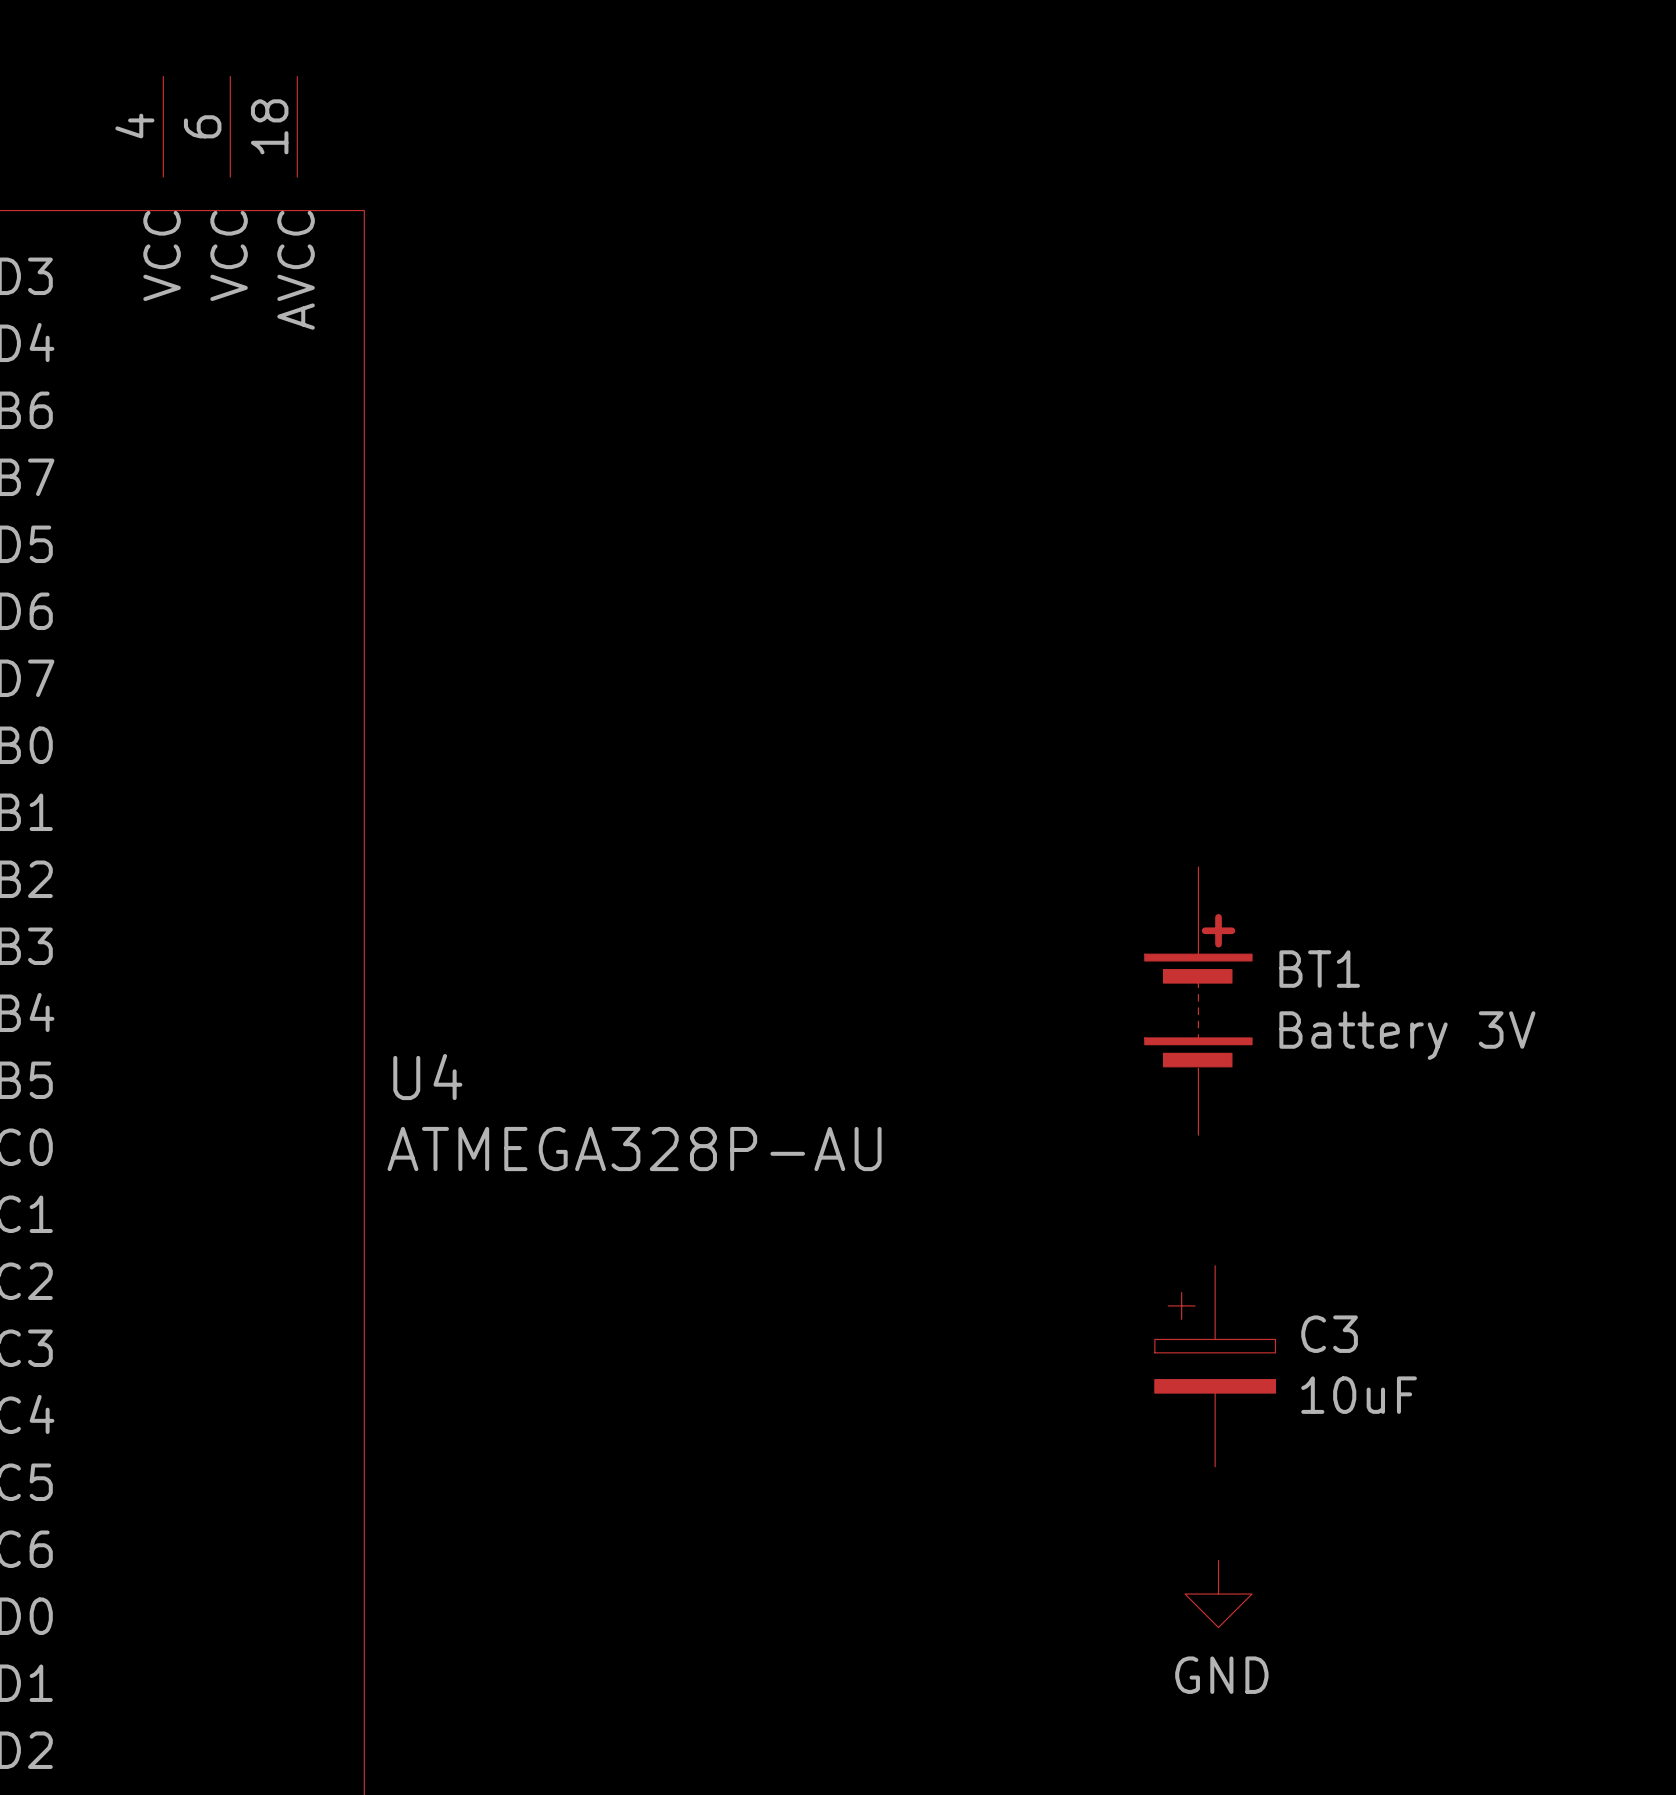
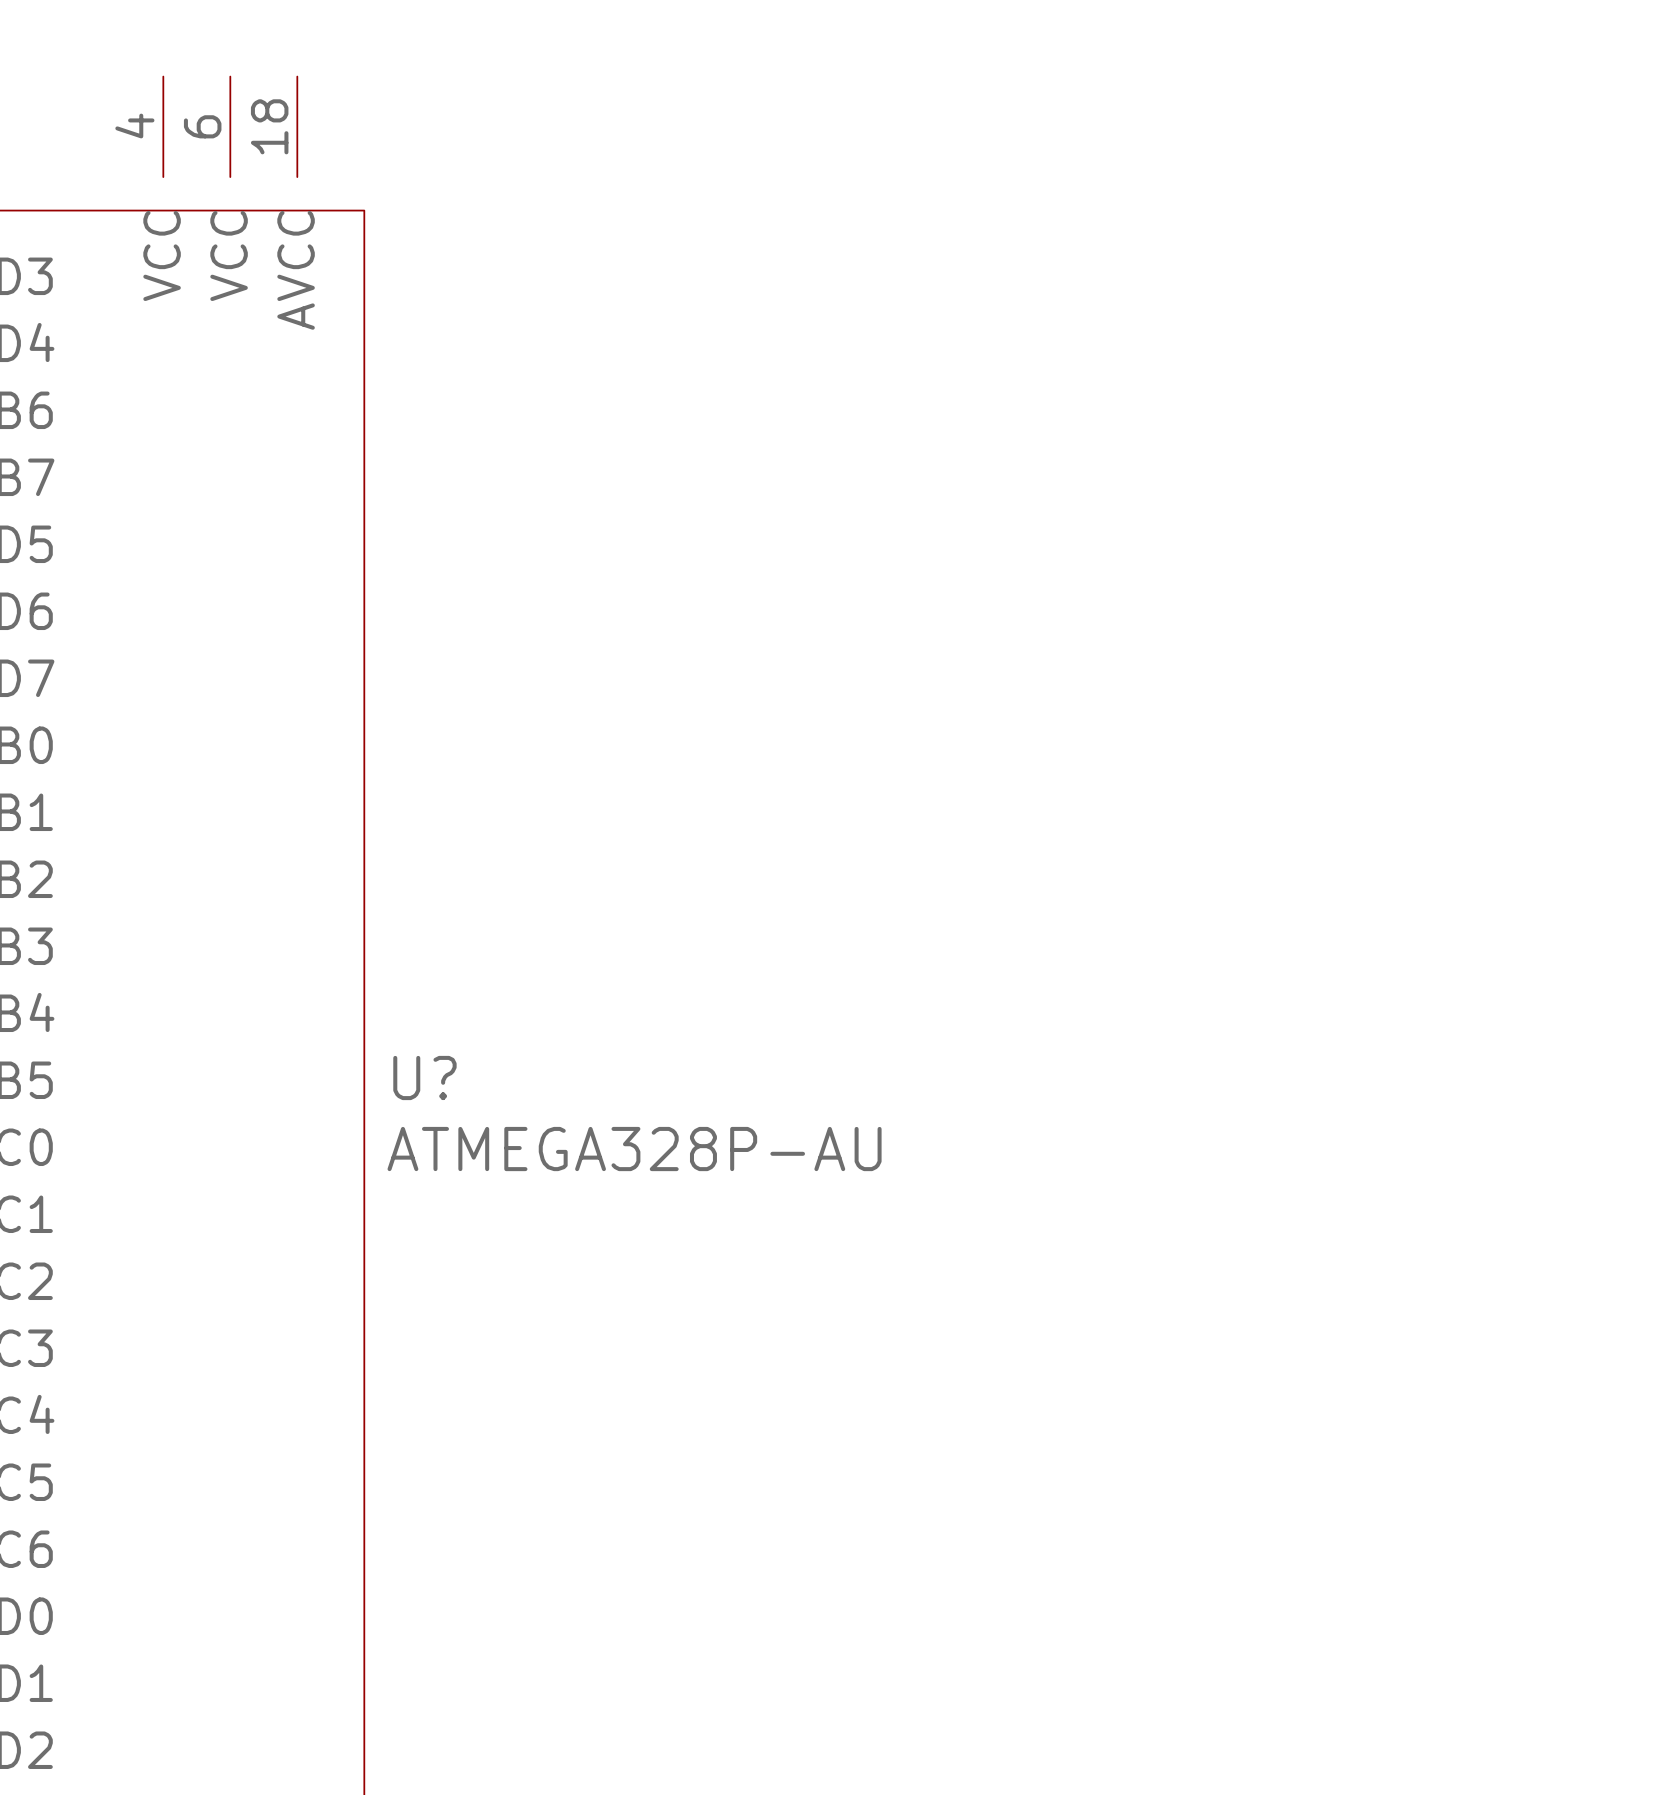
BT1: Battery 3V (1198, 1001) -> none
U4 name: U4 (427, 1077) -> U? (424, 1078)
C3: 10uF (1215, 1366) -> none
power symbol: GND (1218, 1594) -> none

